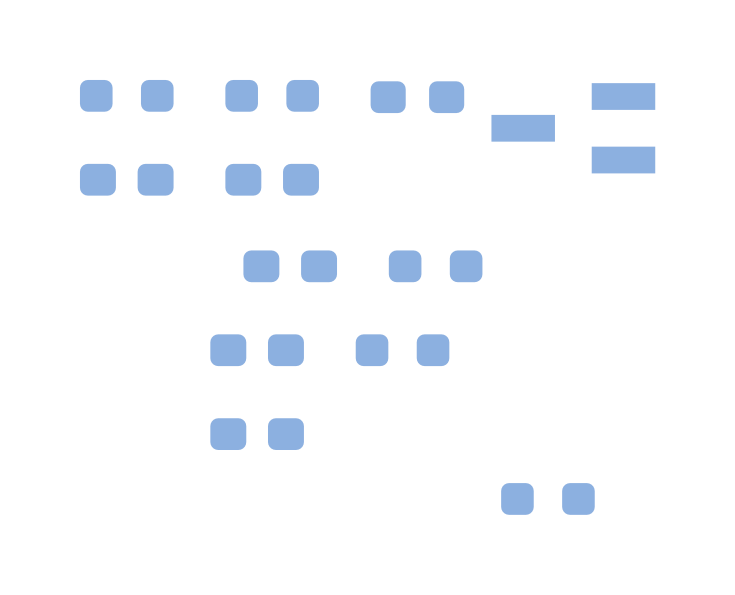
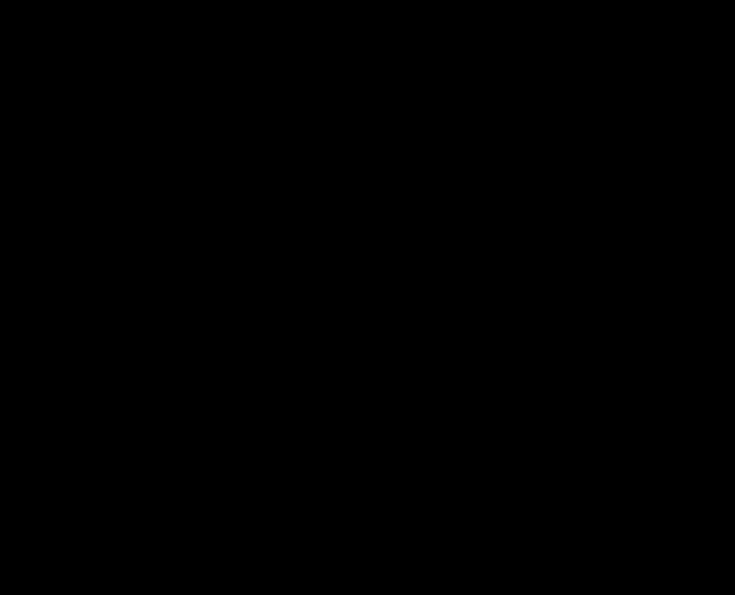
part: (126, 95) -> none
part: (272, 95) -> none
part: (417, 97) -> none
part: (573, 128) -> none
part: (126, 179) -> none
part: (272, 179) -> none
part: (290, 266) -> none
part: (435, 266) -> none
part: (257, 350) -> none
part: (402, 350) -> none
part: (257, 434) -> none
part: (547, 498) -> none

